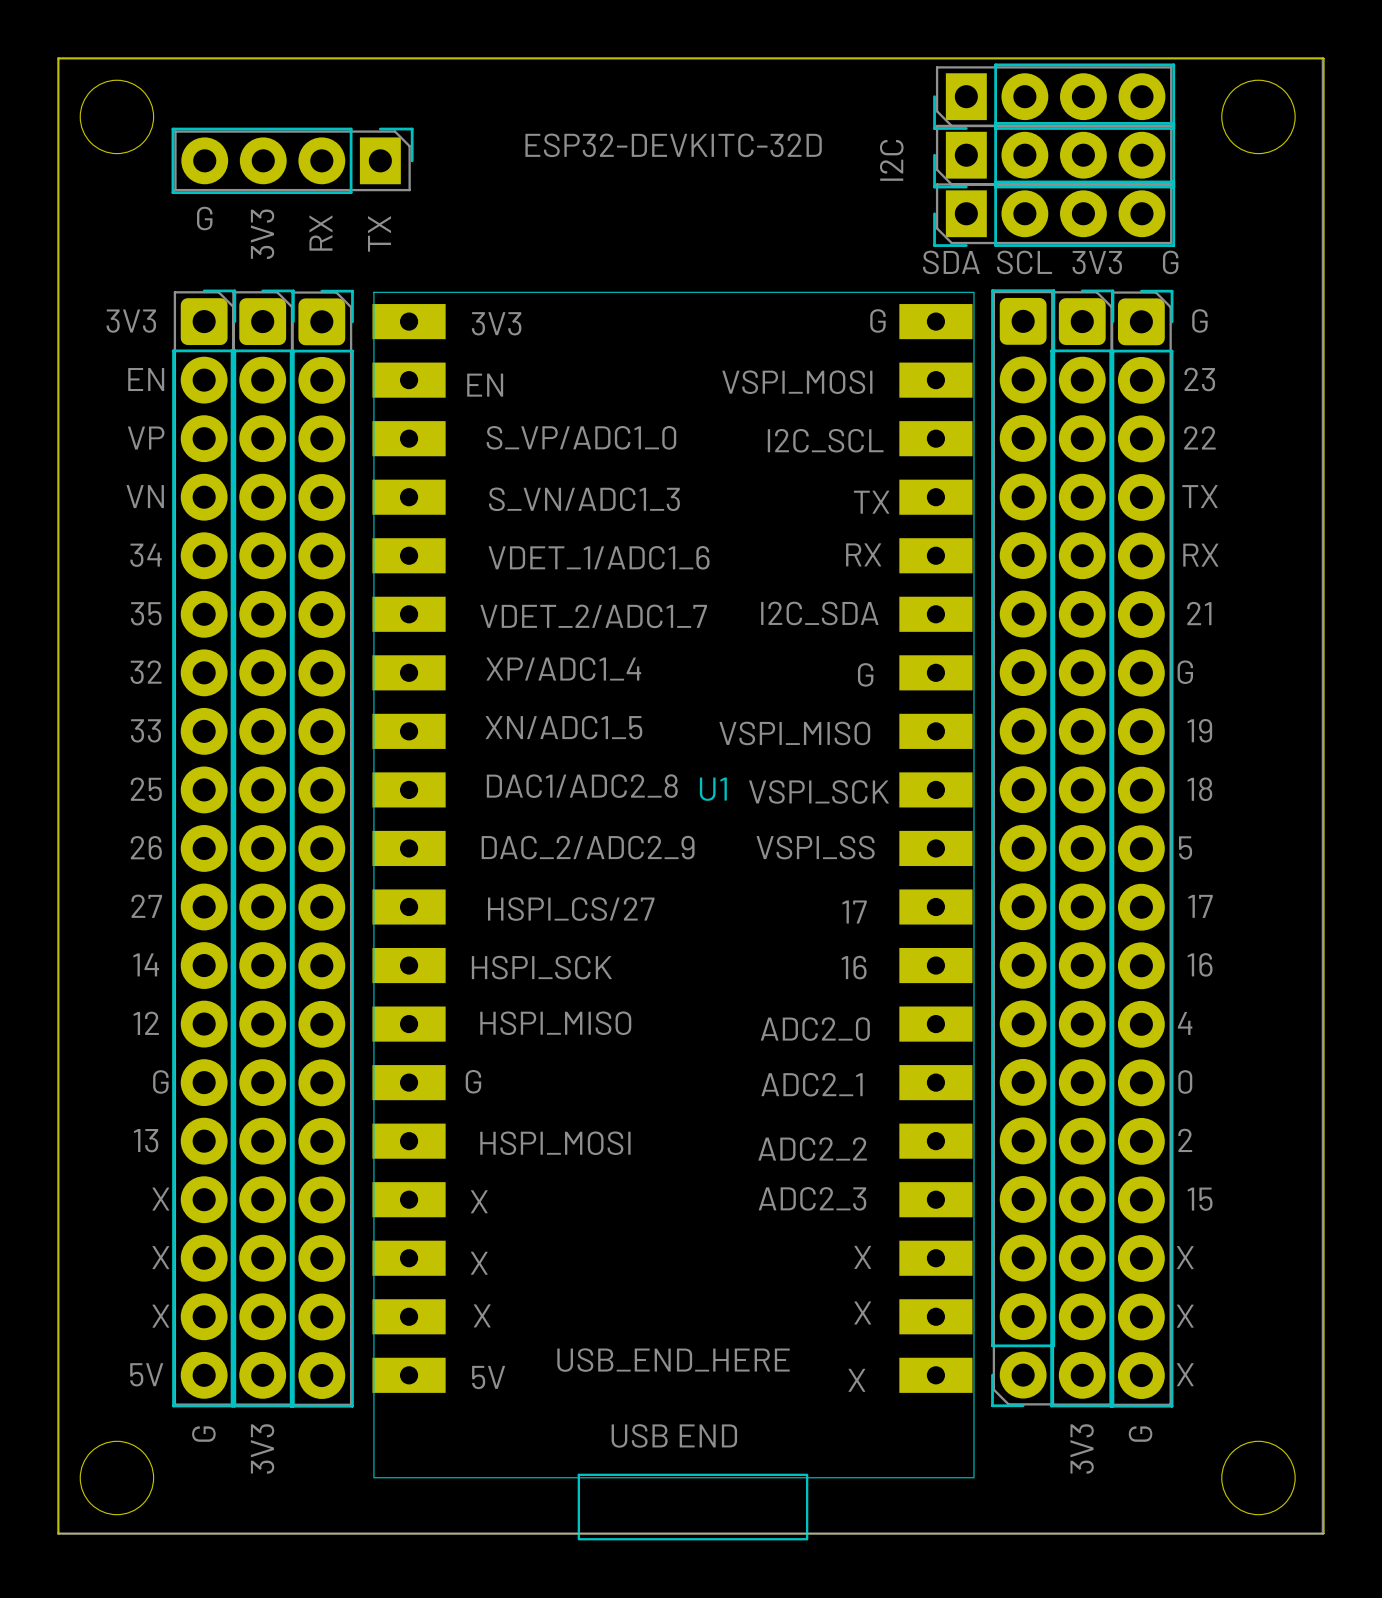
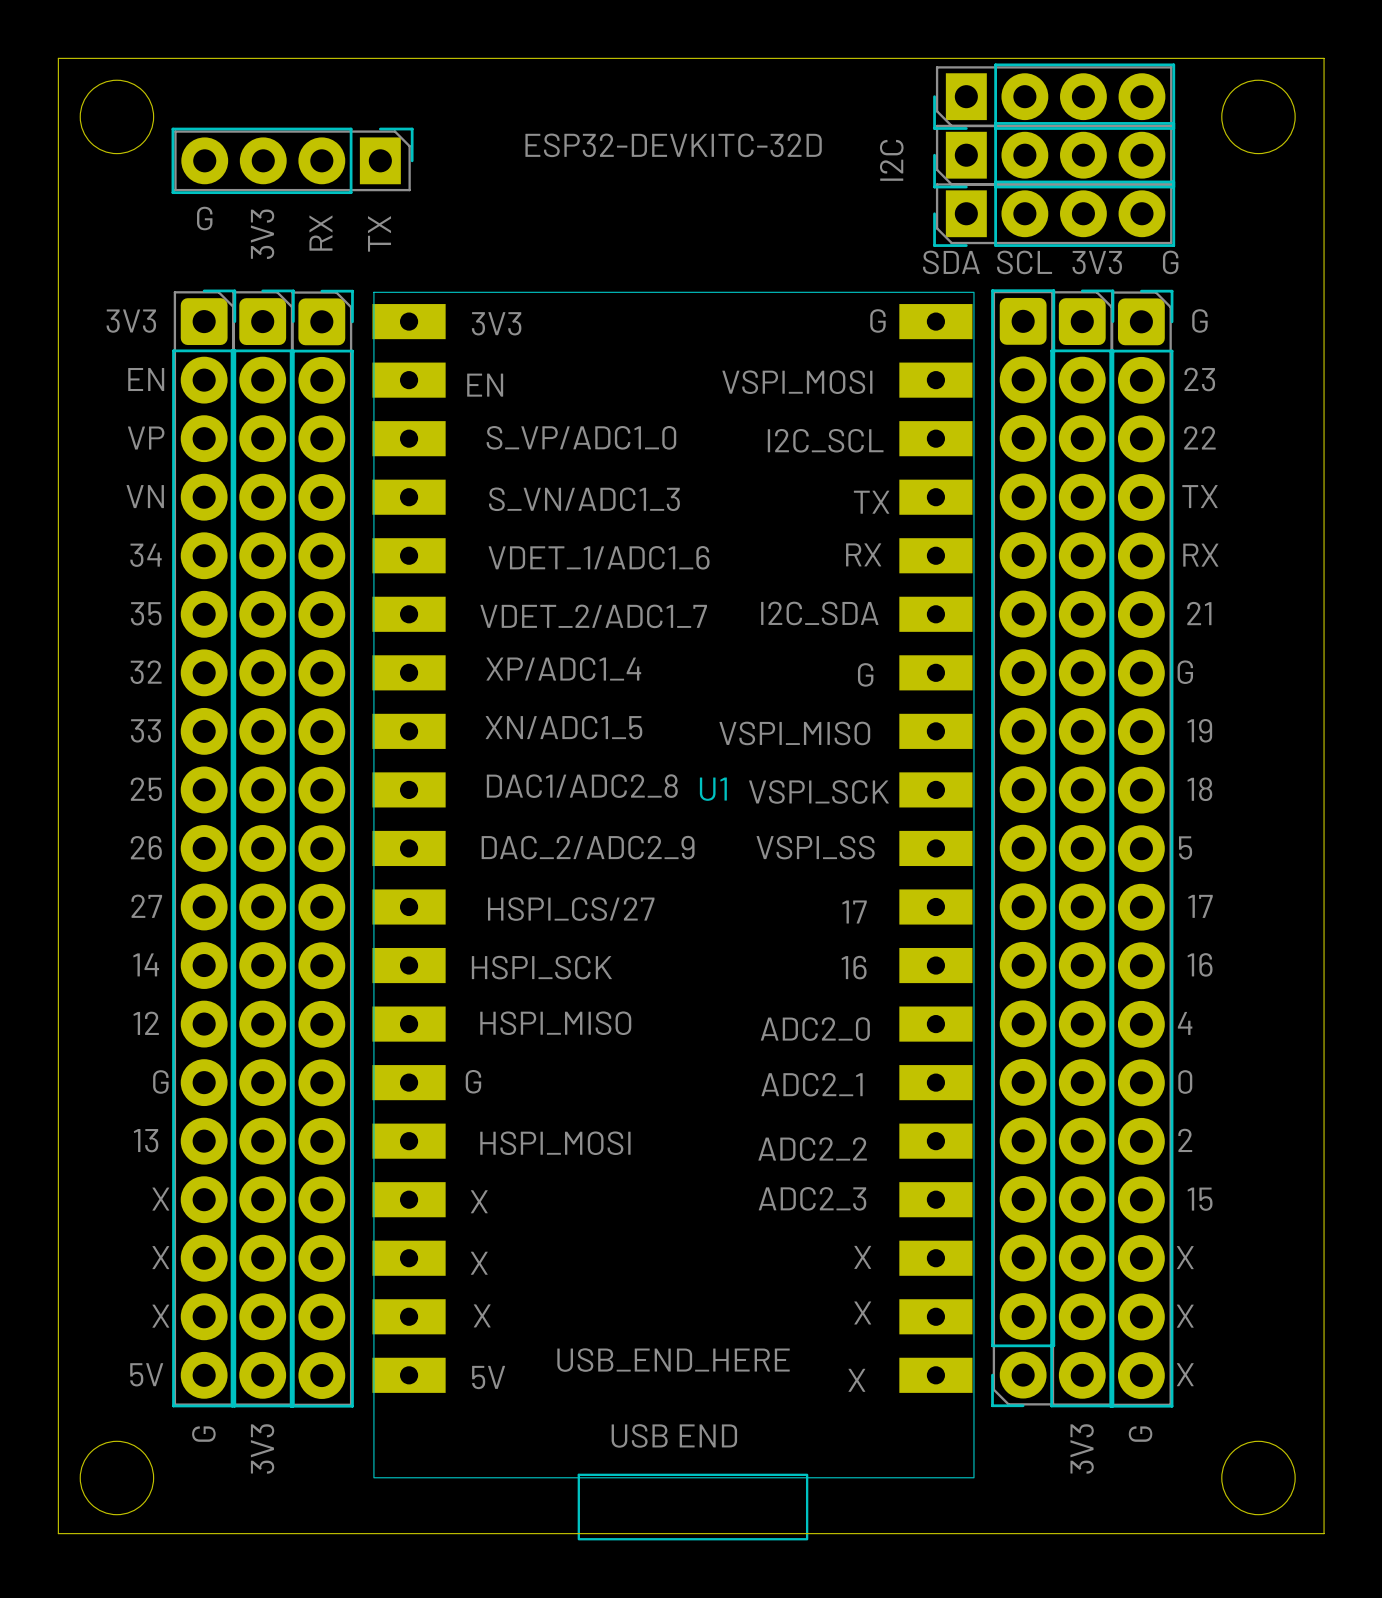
line: (58, 58) (1322, 58) (1322, 1533) (58, 1533) (58, 58) -> none

